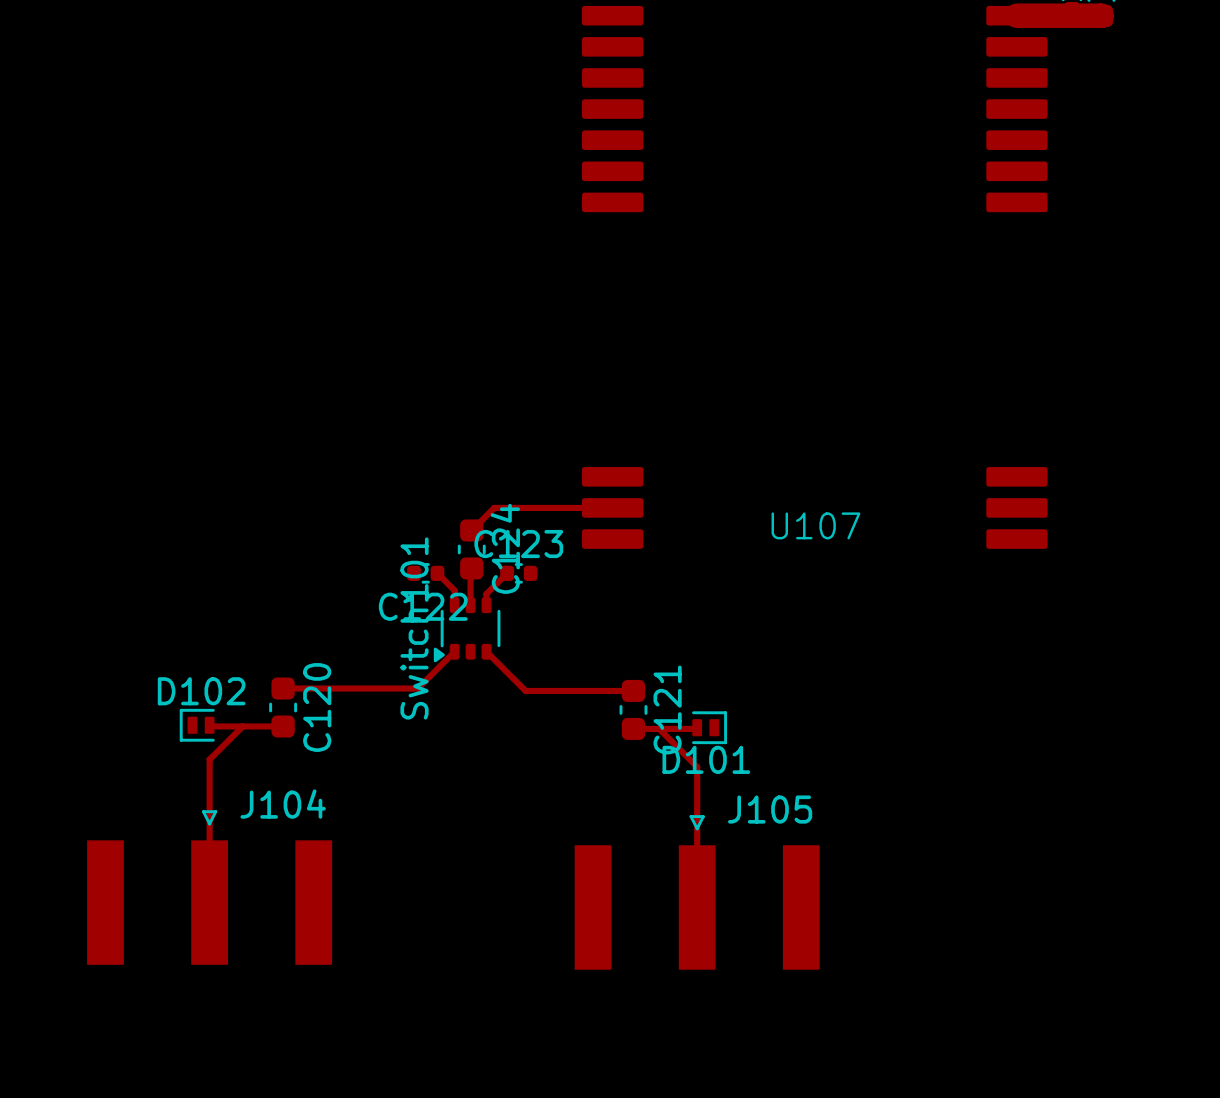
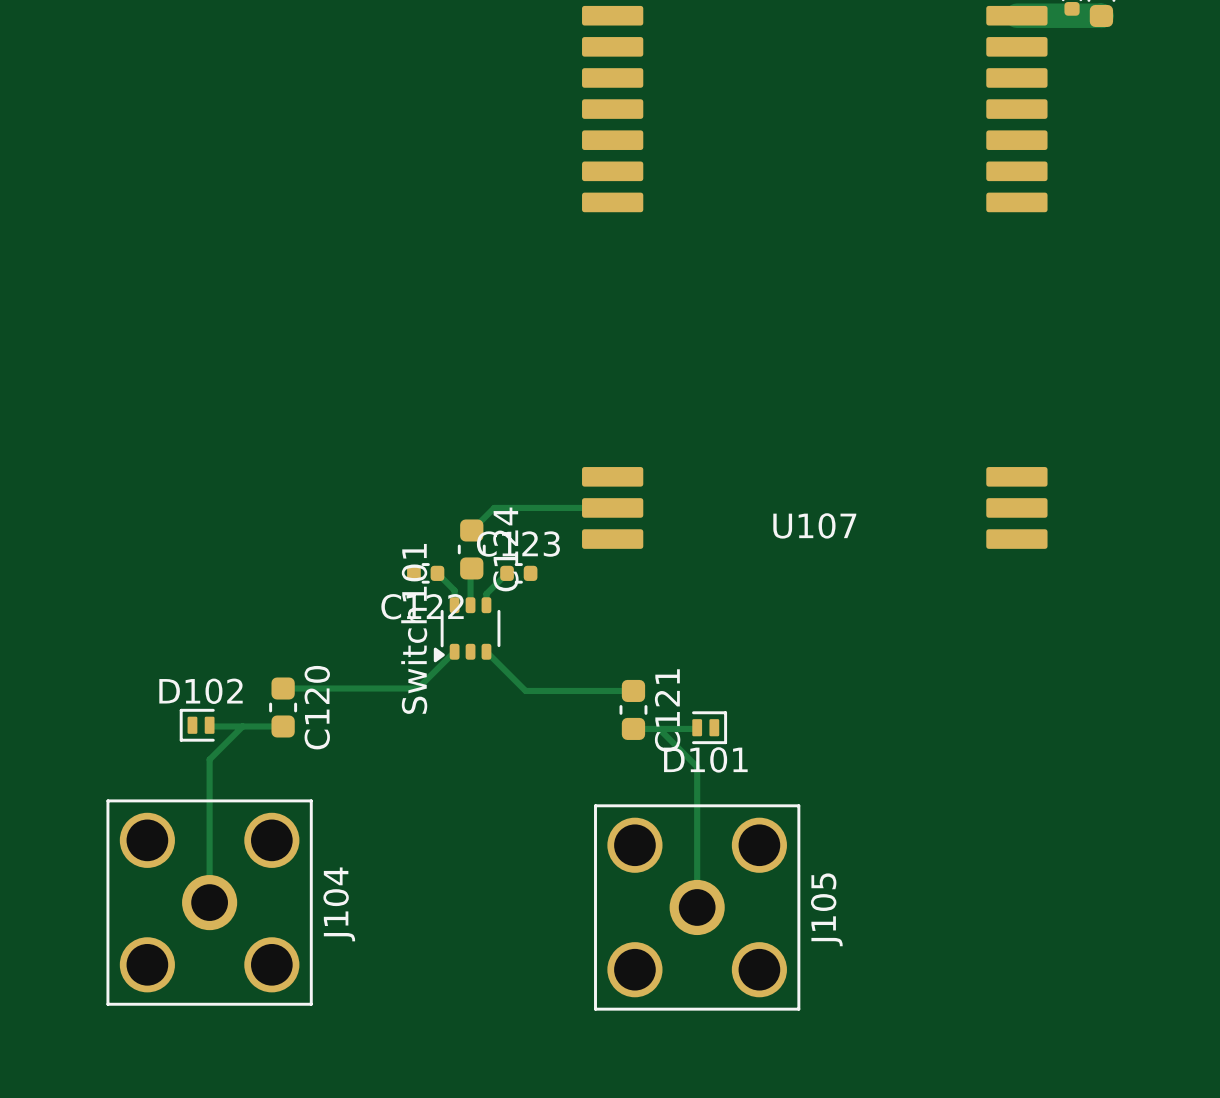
J104 name position: J104 (283, 804) -> J104 (339, 904)
J105 name position: J105 (770, 809) -> J105 (826, 909)
J104 footprint: [87, 810, 333, 965] -> [106, 799, 313, 1006]
J105 footprint: [574, 815, 820, 970] -> [594, 804, 801, 1011]

